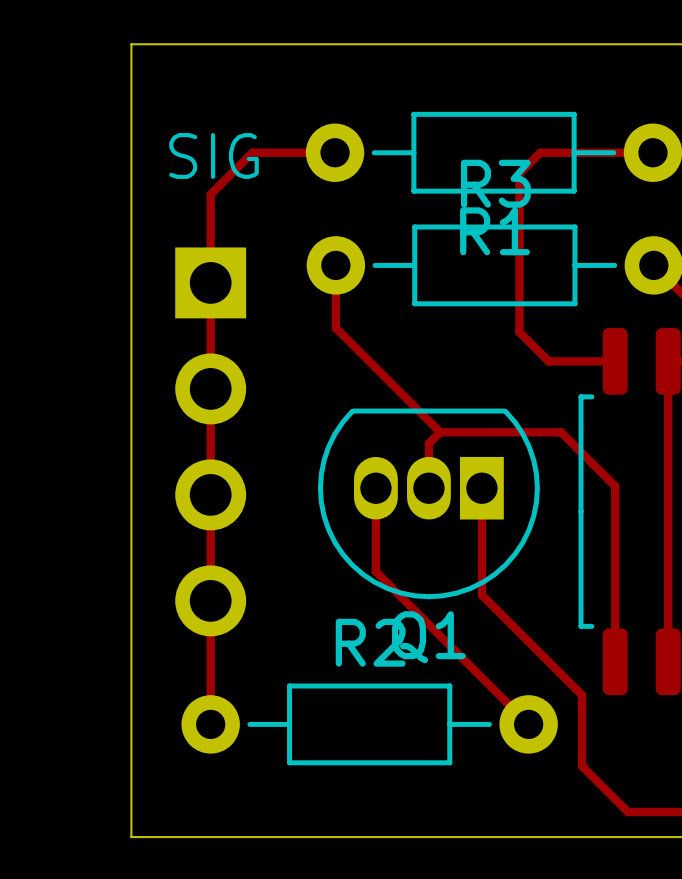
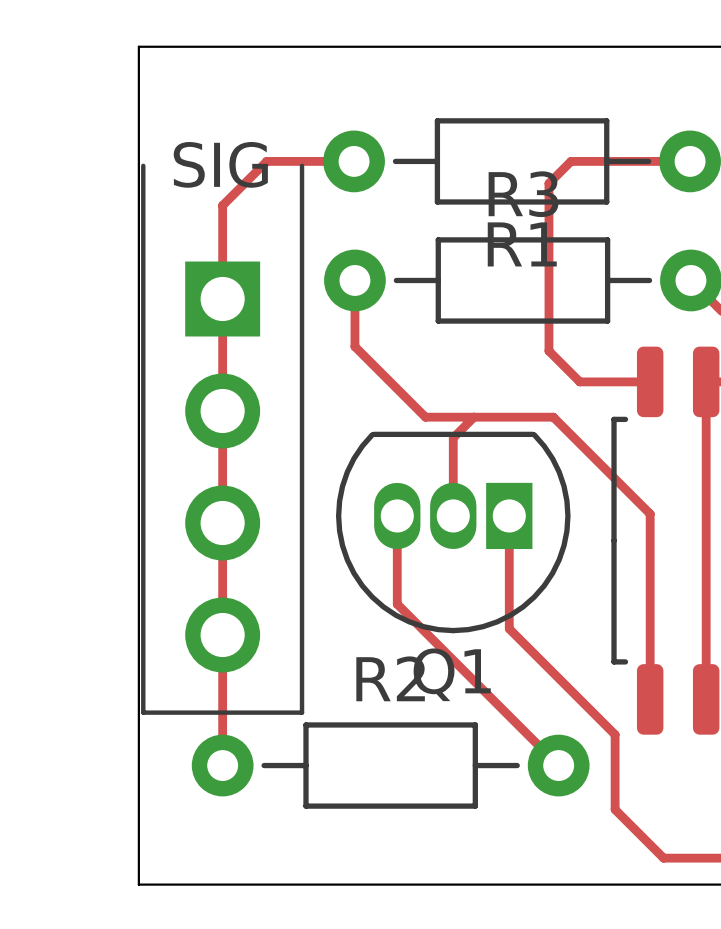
line: none -> (143, 165) (143, 712) (302, 712) (302, 165)
track: (402, 394) (440, 432) -> none
track: (440, 432) (428, 443) -> (474, 417) (453, 437) (453, 468)
track: (440, 432) (561, 432) -> (425, 417) (553, 417) (593, 456)

